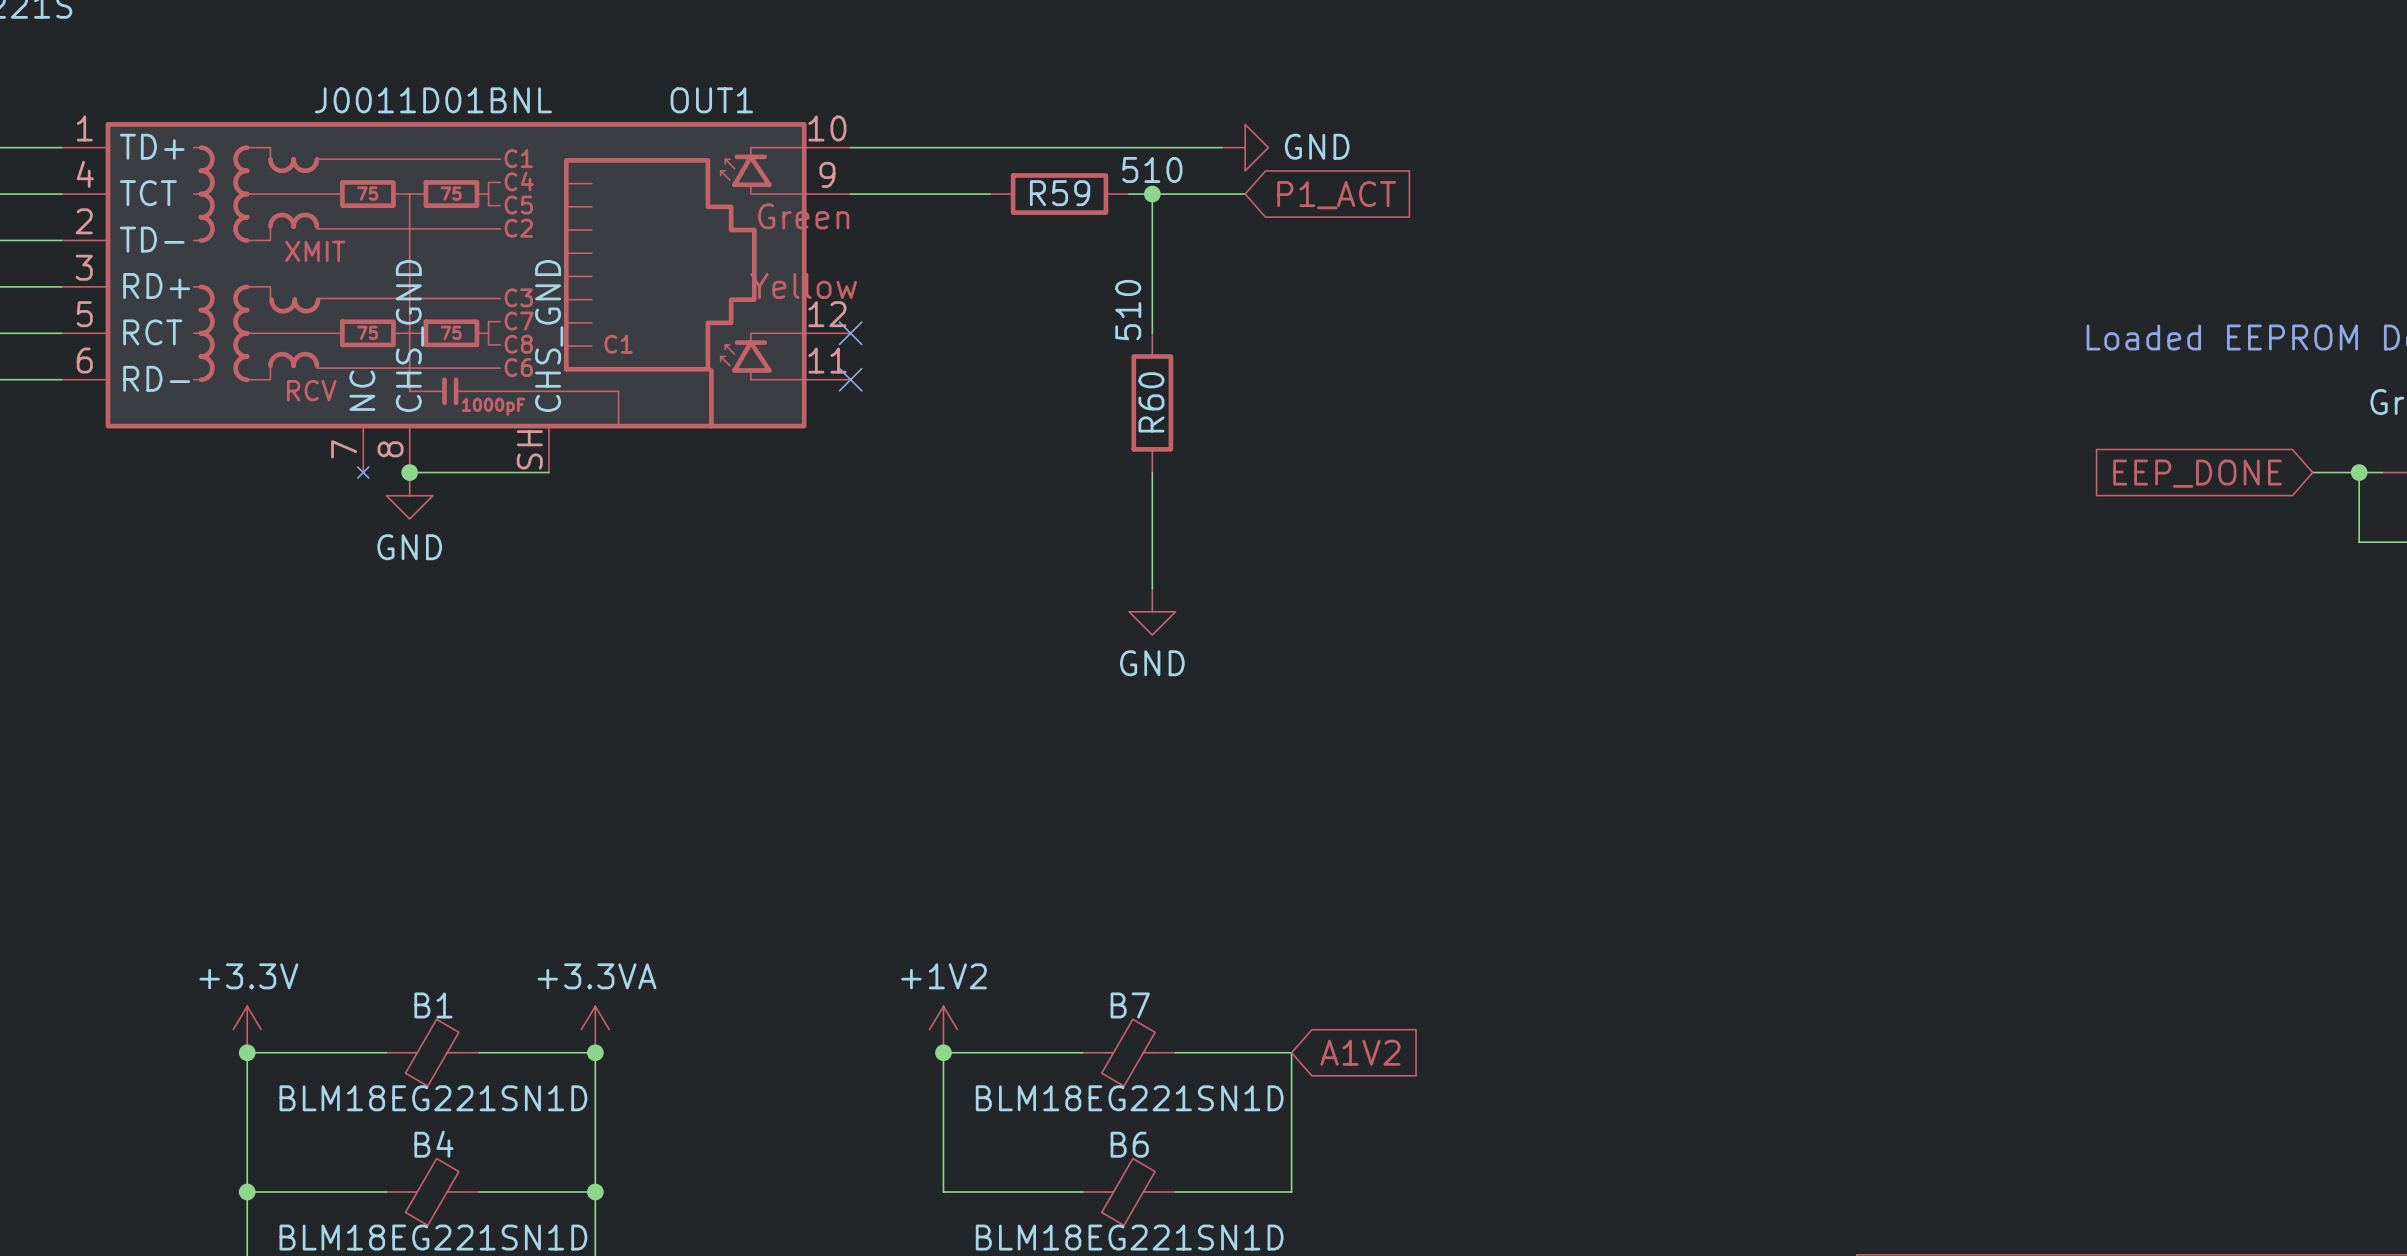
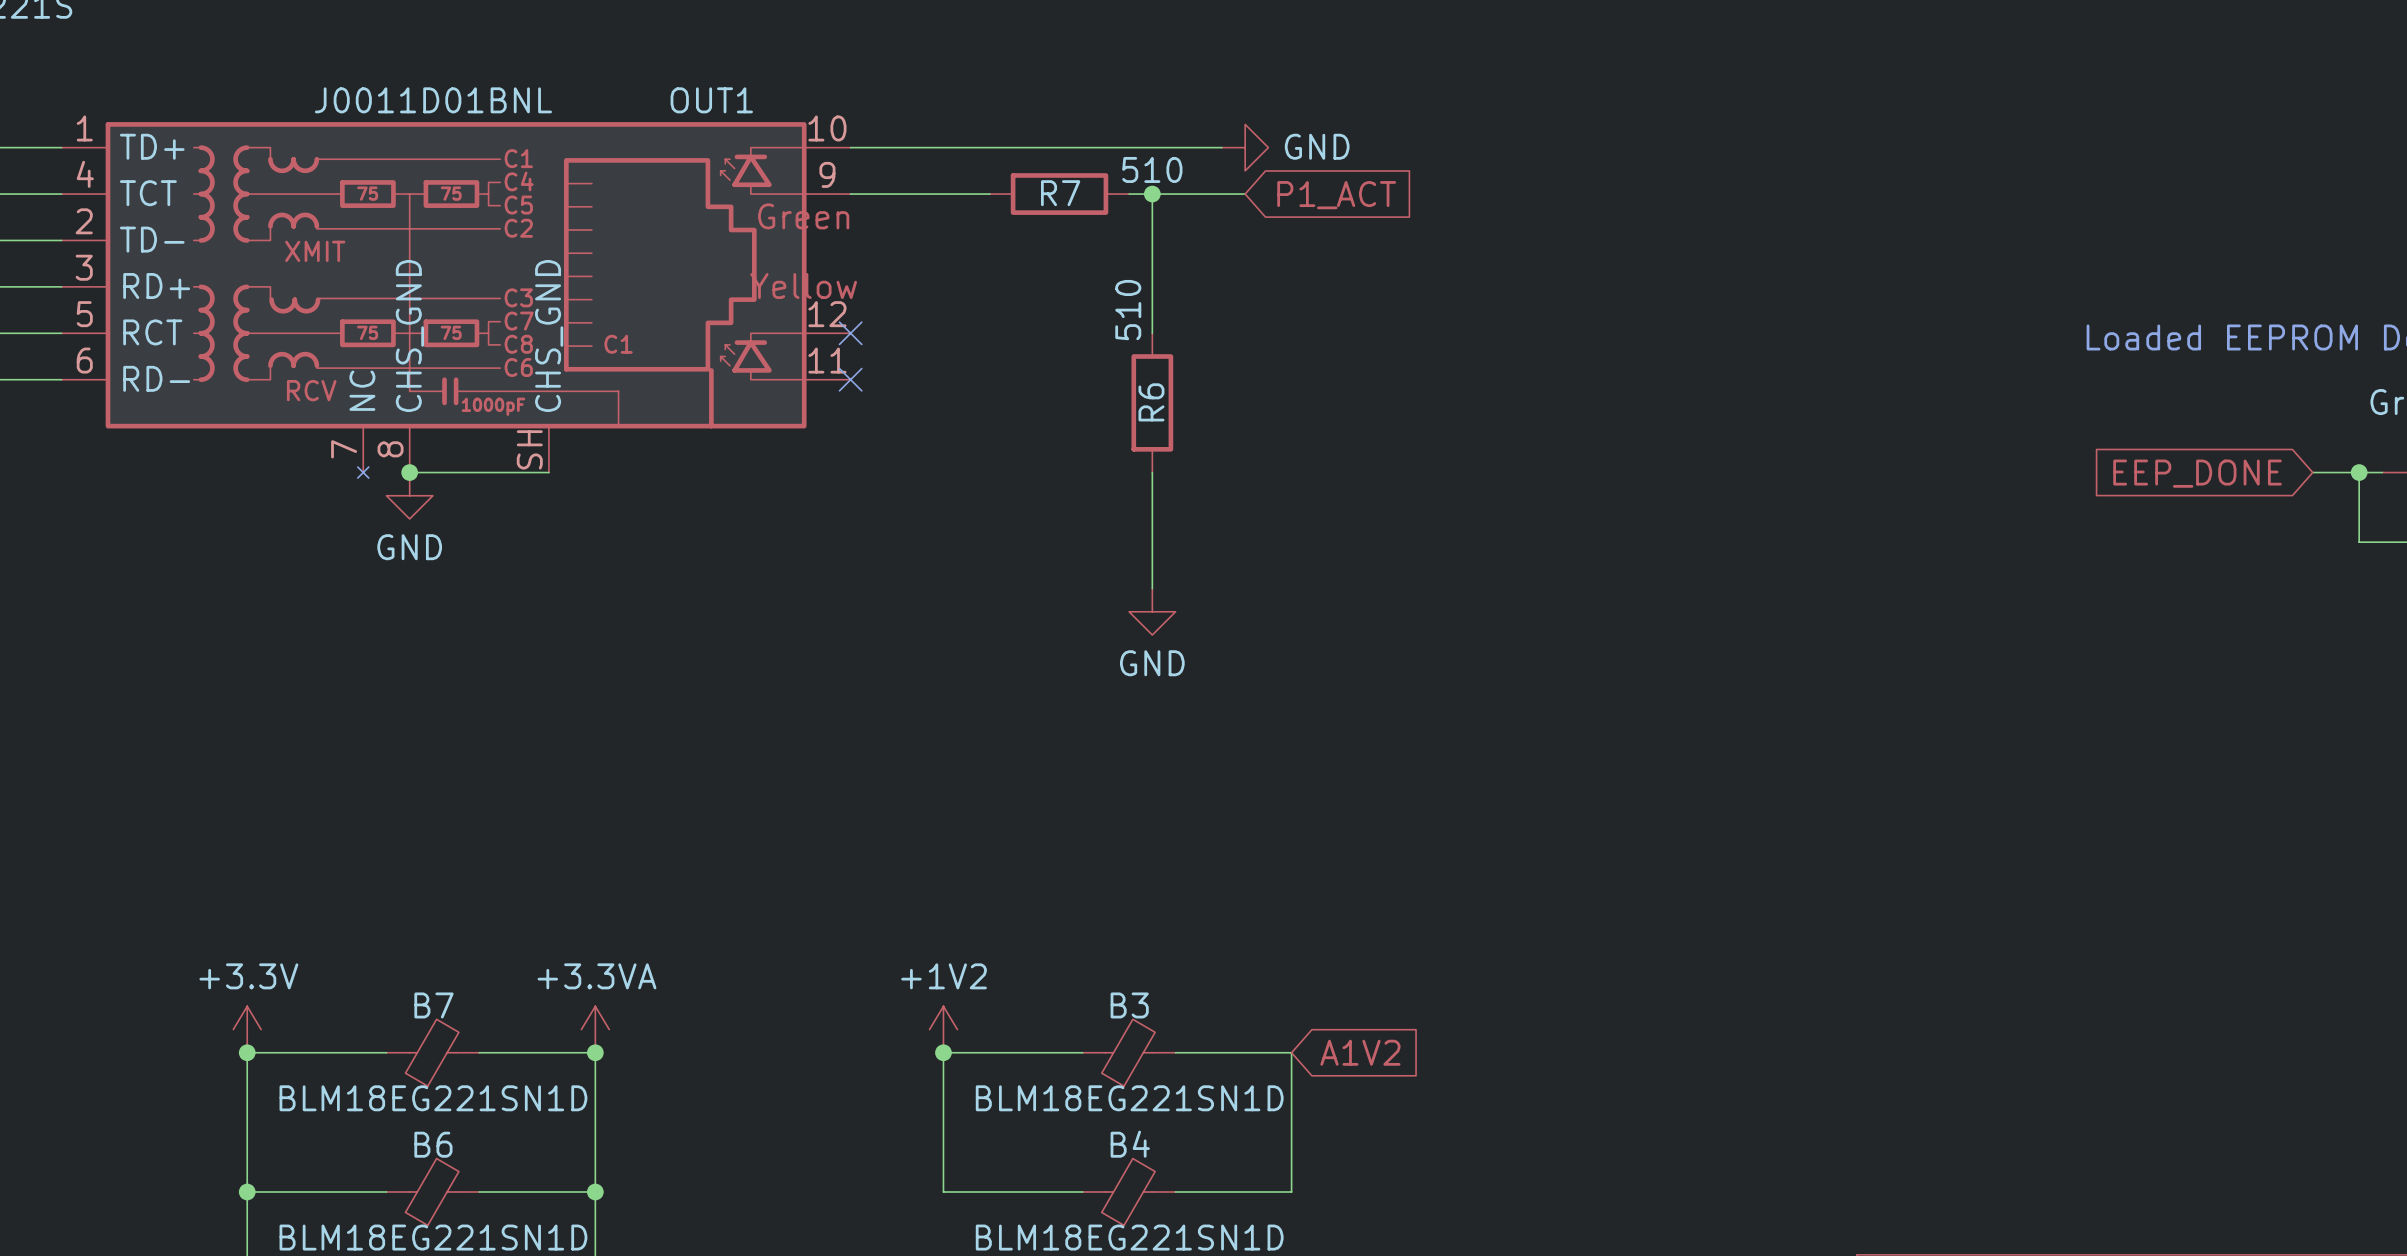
R59 name: R59 (1060, 193) -> R7 (1060, 193)
R60 name: R60 (1151, 402) -> R6 (1151, 402)
B1 name: B1 (433, 1005) -> B7 (433, 1005)
B7 name: B7 (1130, 1005) -> B3 (1129, 1005)
B4 name: B4 (433, 1144) -> B6 (433, 1144)
B6 name: B6 (1129, 1144) -> B4 (1130, 1144)

